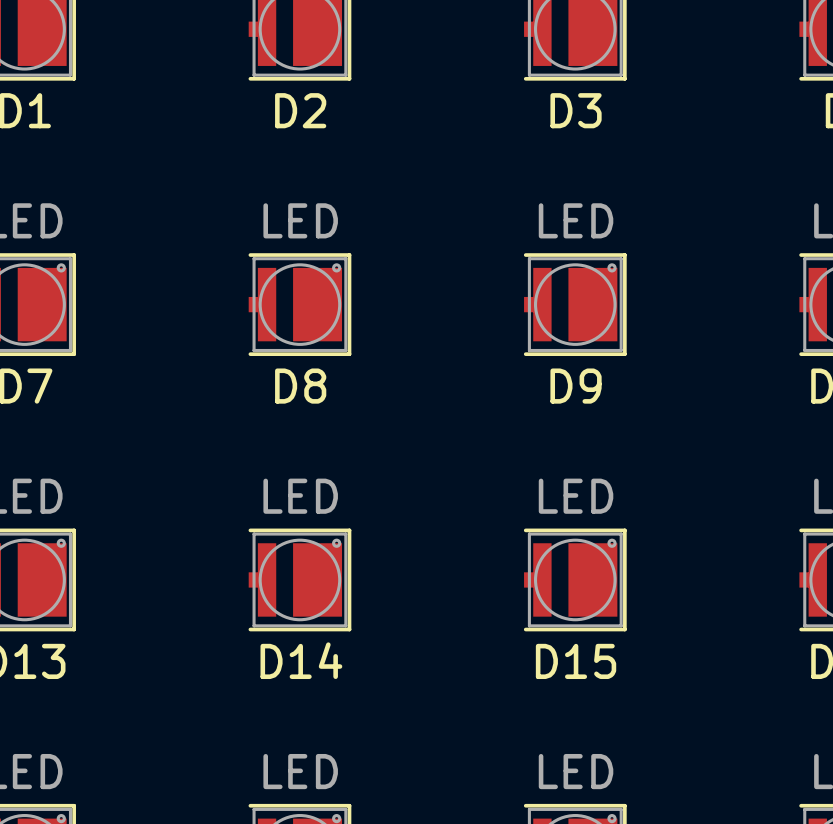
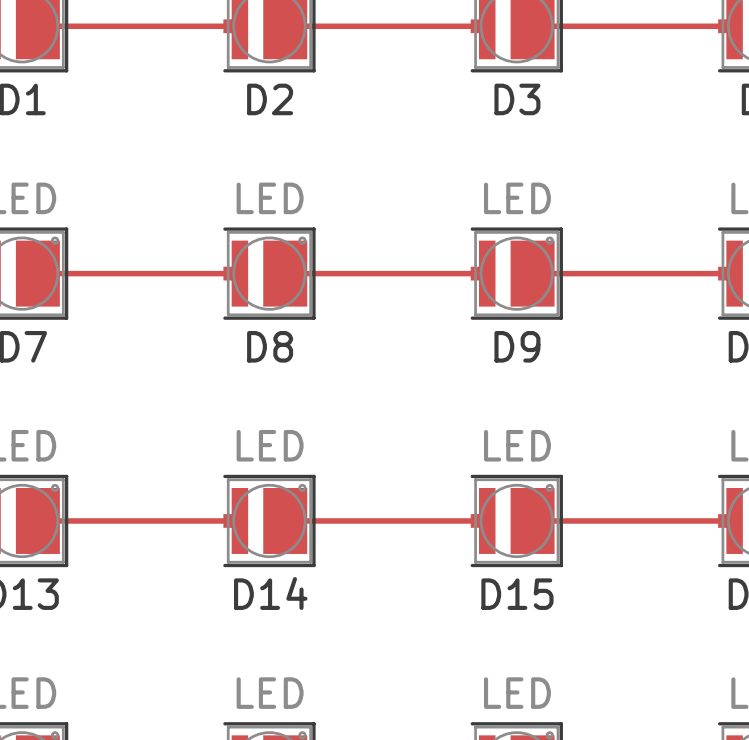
track: none -> (37, 26) (239, 26)
track: none -> (285, 26) (487, 26)
track: none -> (532, 26) (734, 26)
track: none -> (37, 273) (239, 273)
track: none -> (285, 273) (487, 273)
track: none -> (532, 273) (734, 273)
track: none -> (37, 520) (239, 520)
track: none -> (285, 520) (487, 520)
track: none -> (532, 520) (734, 520)

